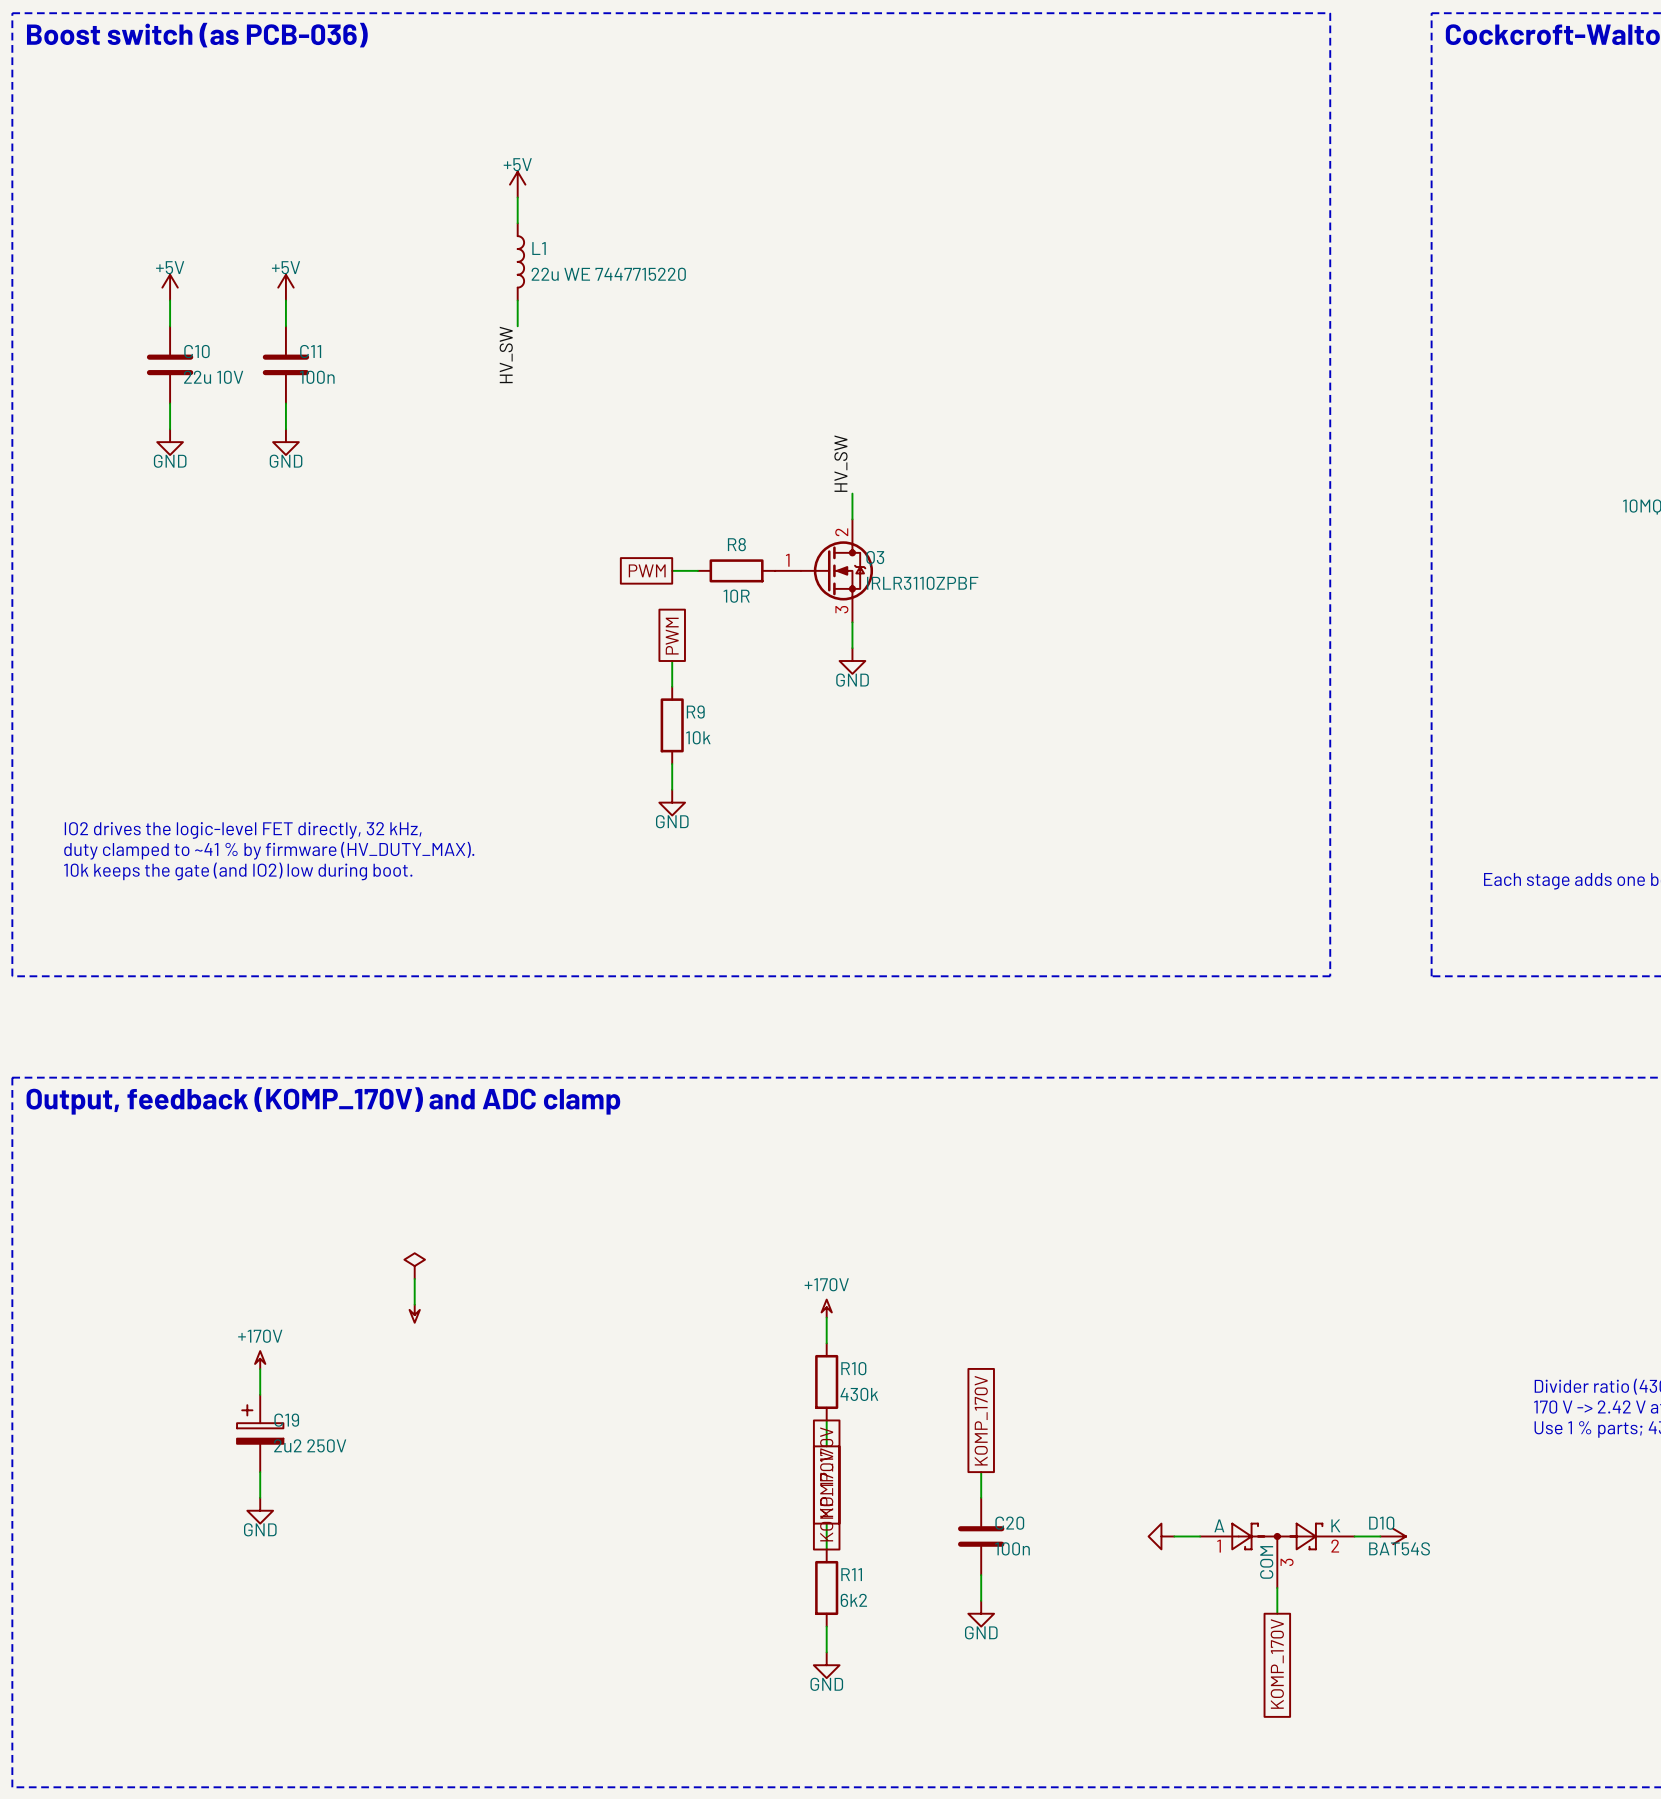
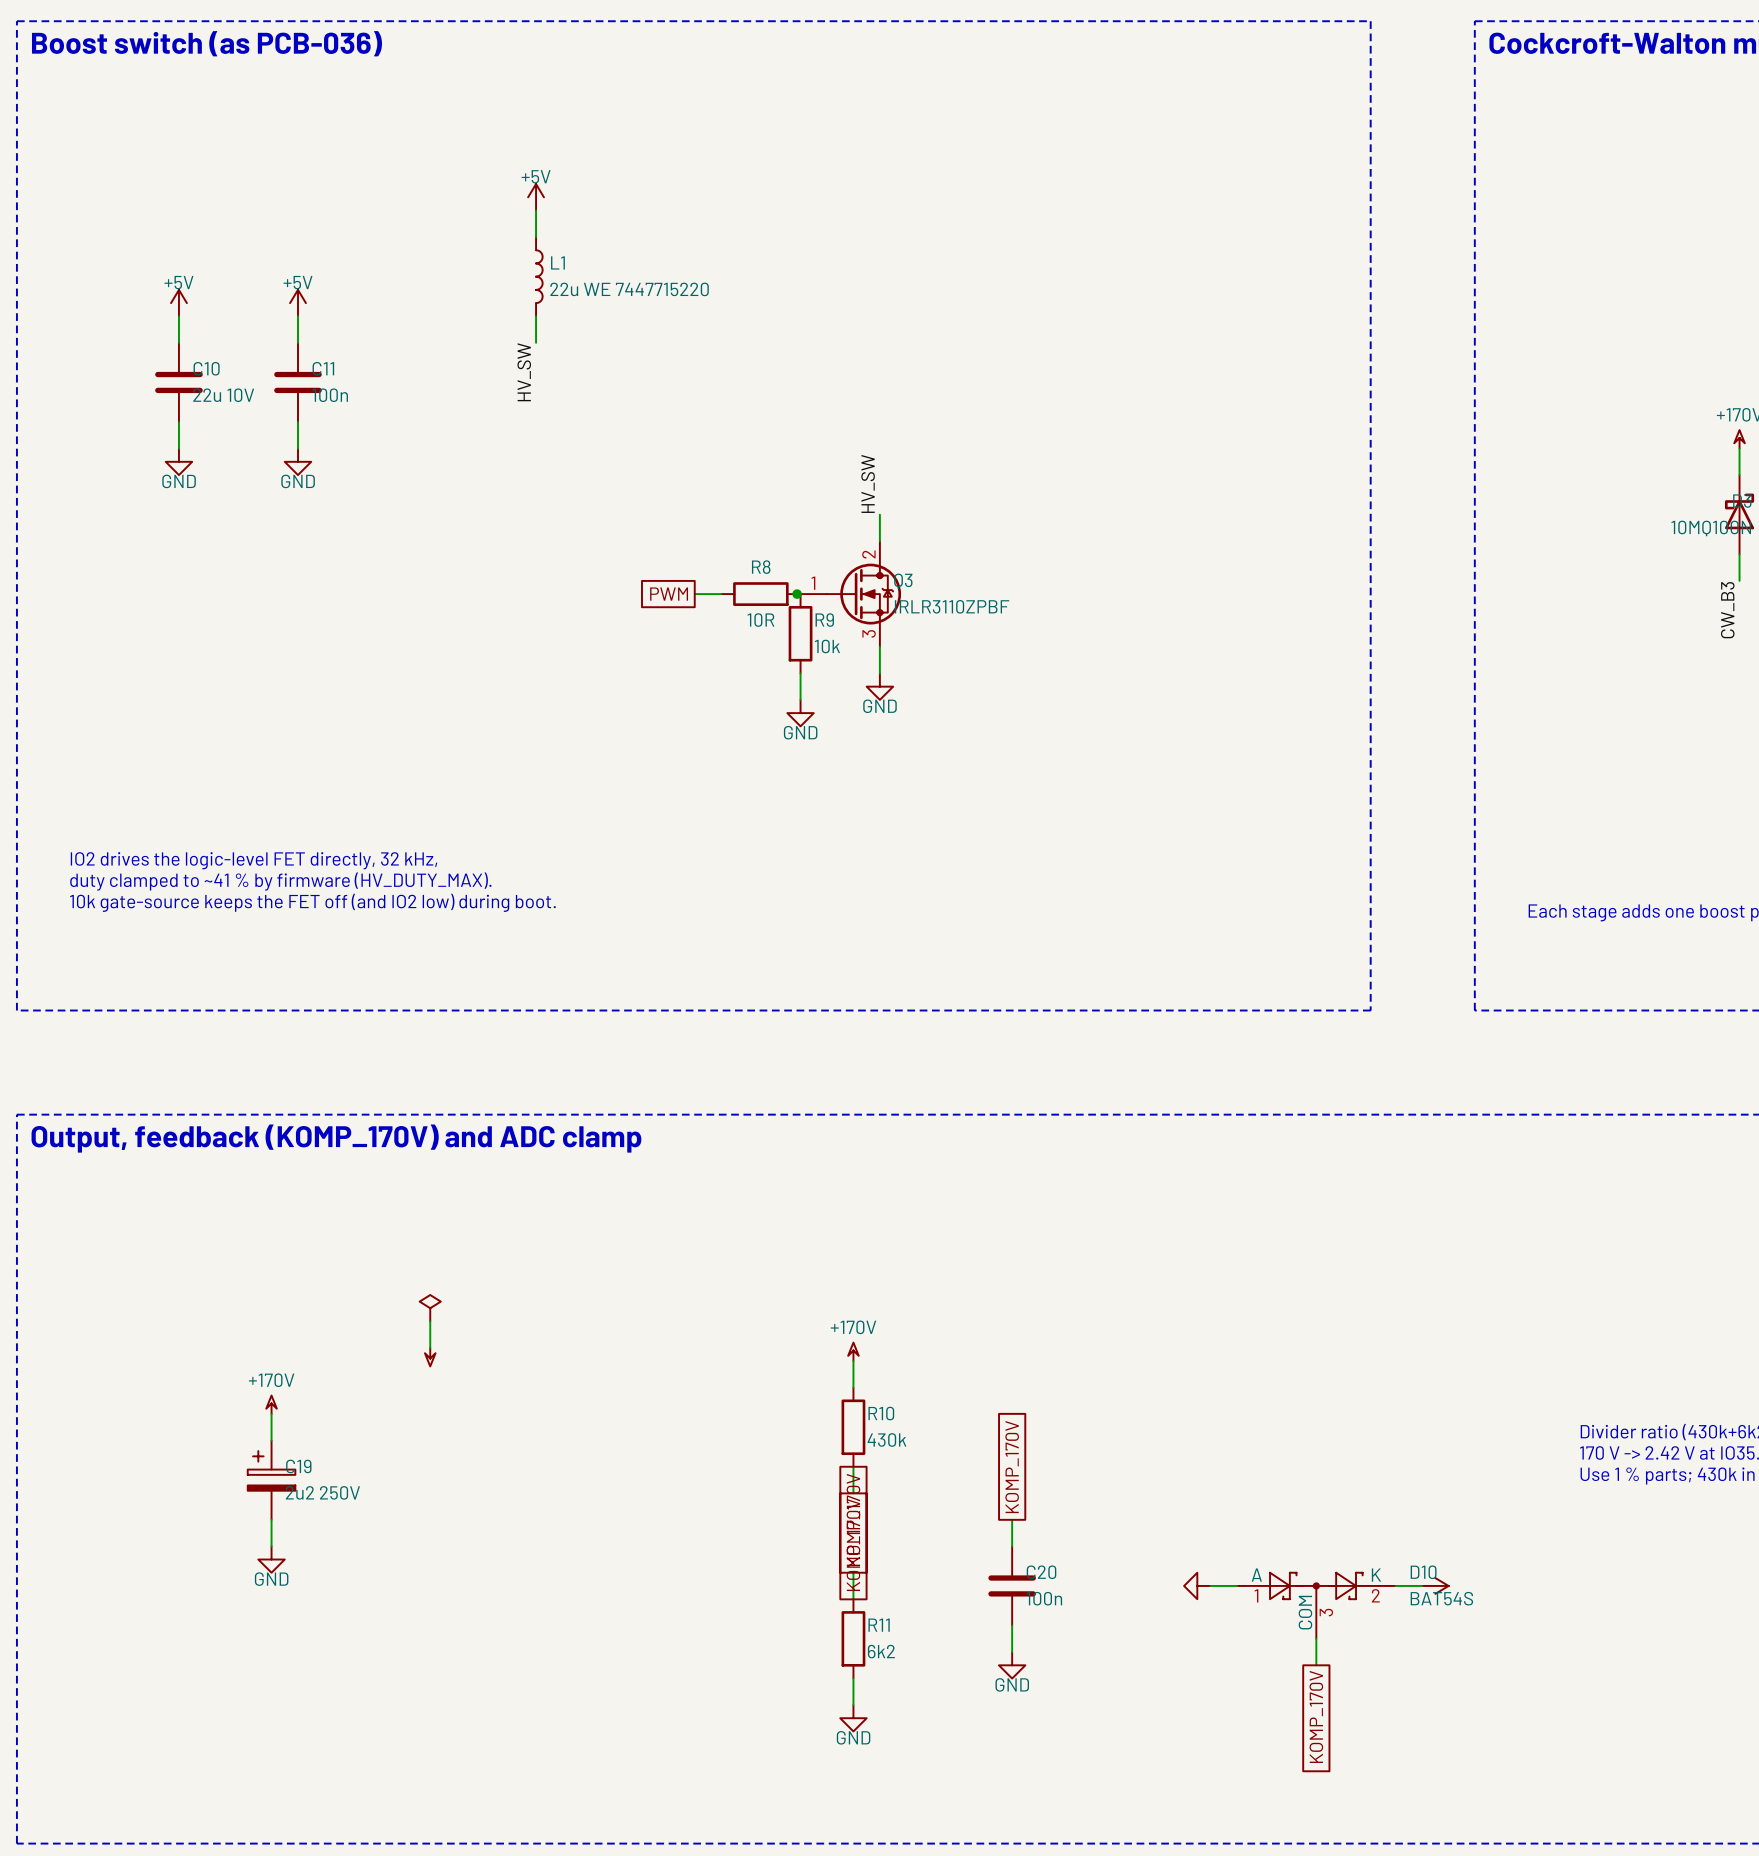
junction: none -> (797, 594)
global label: PWM (672, 636) -> none
wire: (672, 661) (672, 686) -> (800, 673) (800, 699)
R9 position: (672, 725) -> (800, 633)
wire: (672, 764) (672, 789) -> none
power symbol position: GND (672, 802) -> GND (800, 713)
text: 10k keeps the gate (and IO2) low during boot. (238, 871) -> 10k gate-source keeps the FET off (and IO2 low) during boot. (312, 902)

